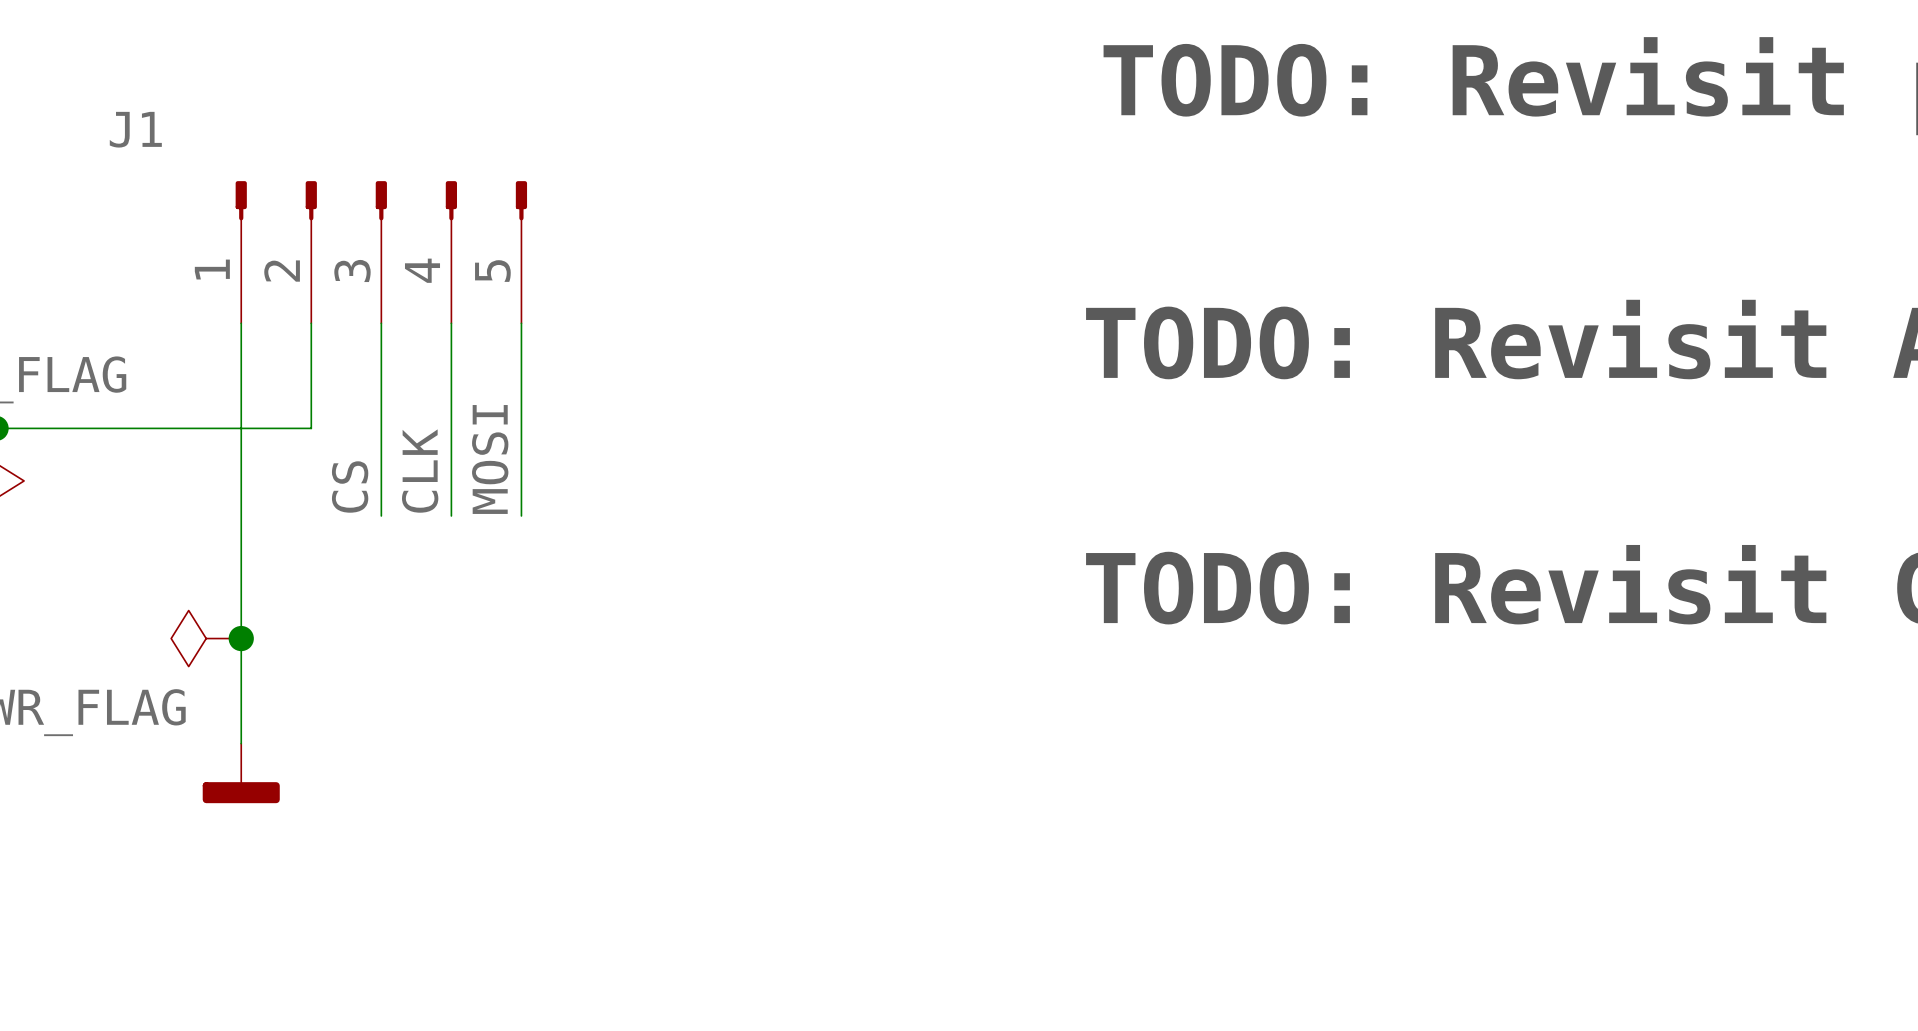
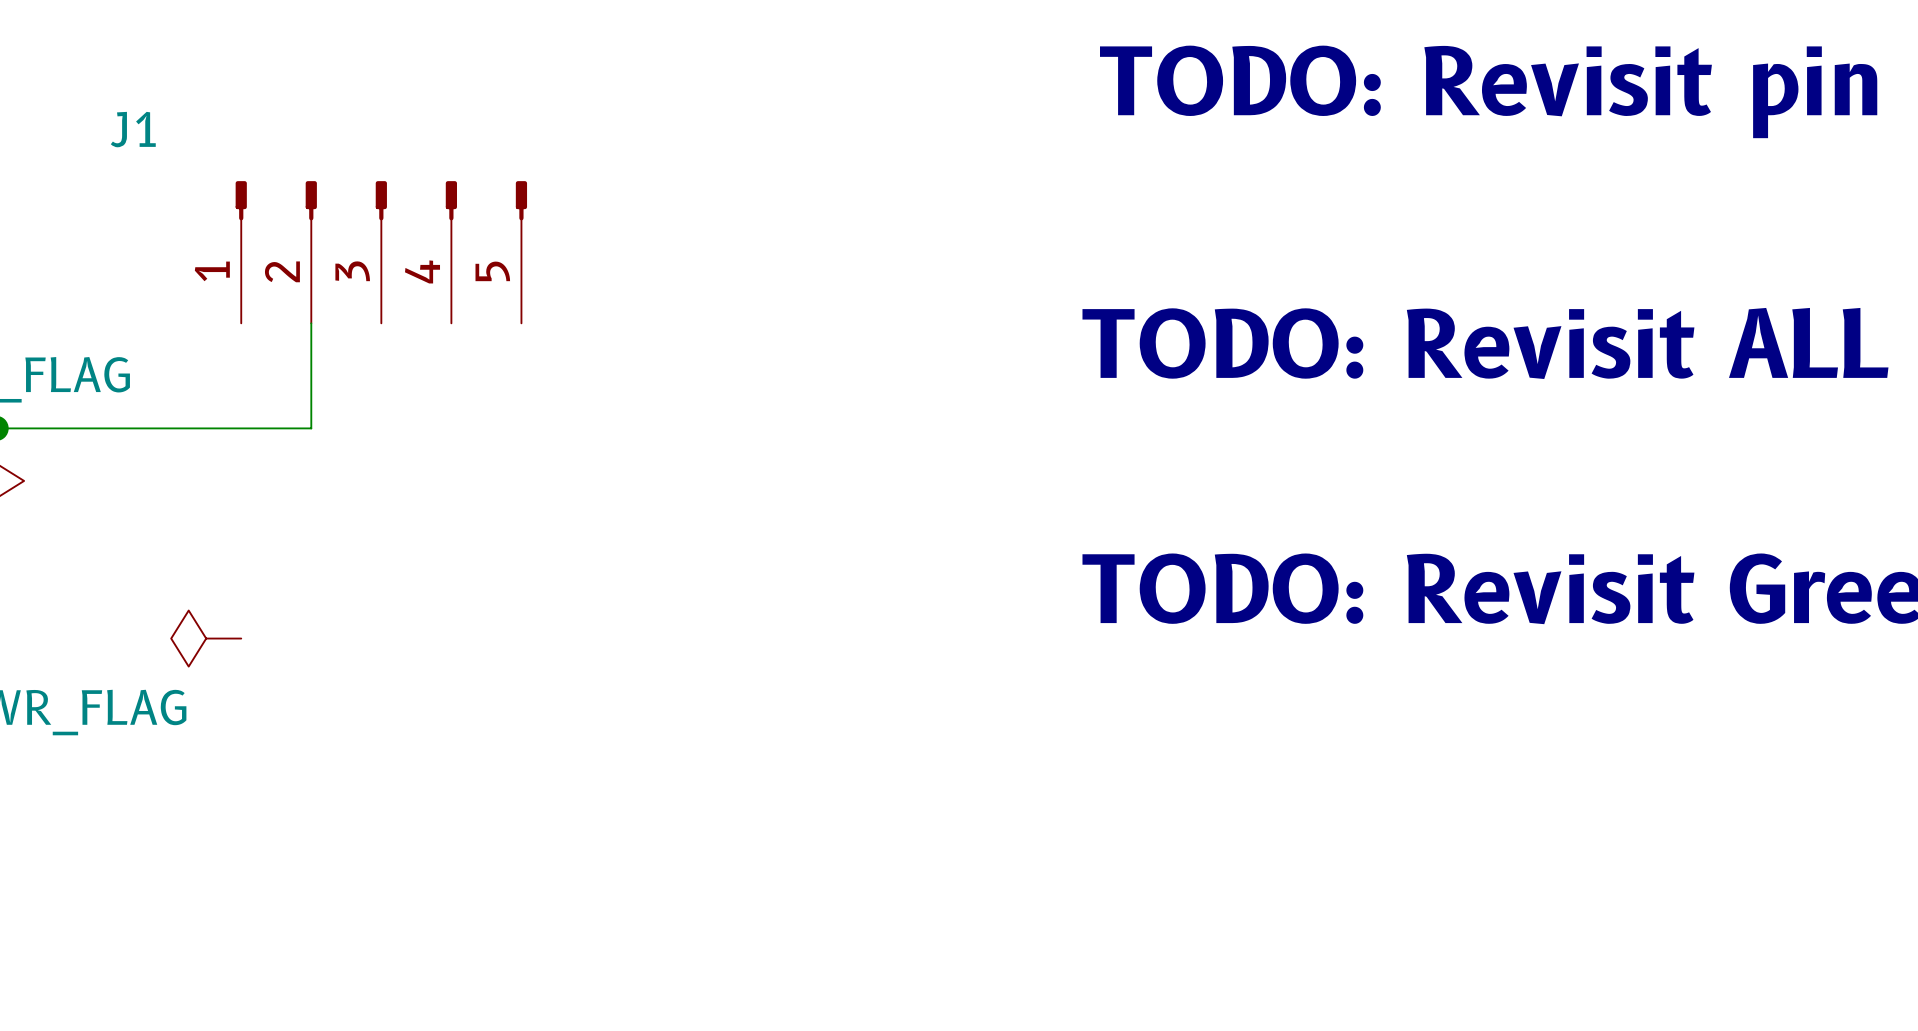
wire: (241, 323) (241, 743) -> none
wire: (381, 323) (381, 515) -> none
wire: (451, 323) (451, 515) -> none
wire: (521, 323) (521, 515) -> none
label: MOSI (490, 459) -> none
label: CLK (420, 471) -> none
label: CS (350, 486) -> none
junction: (241, 638) -> none
power symbol: (241, 773) -> none

